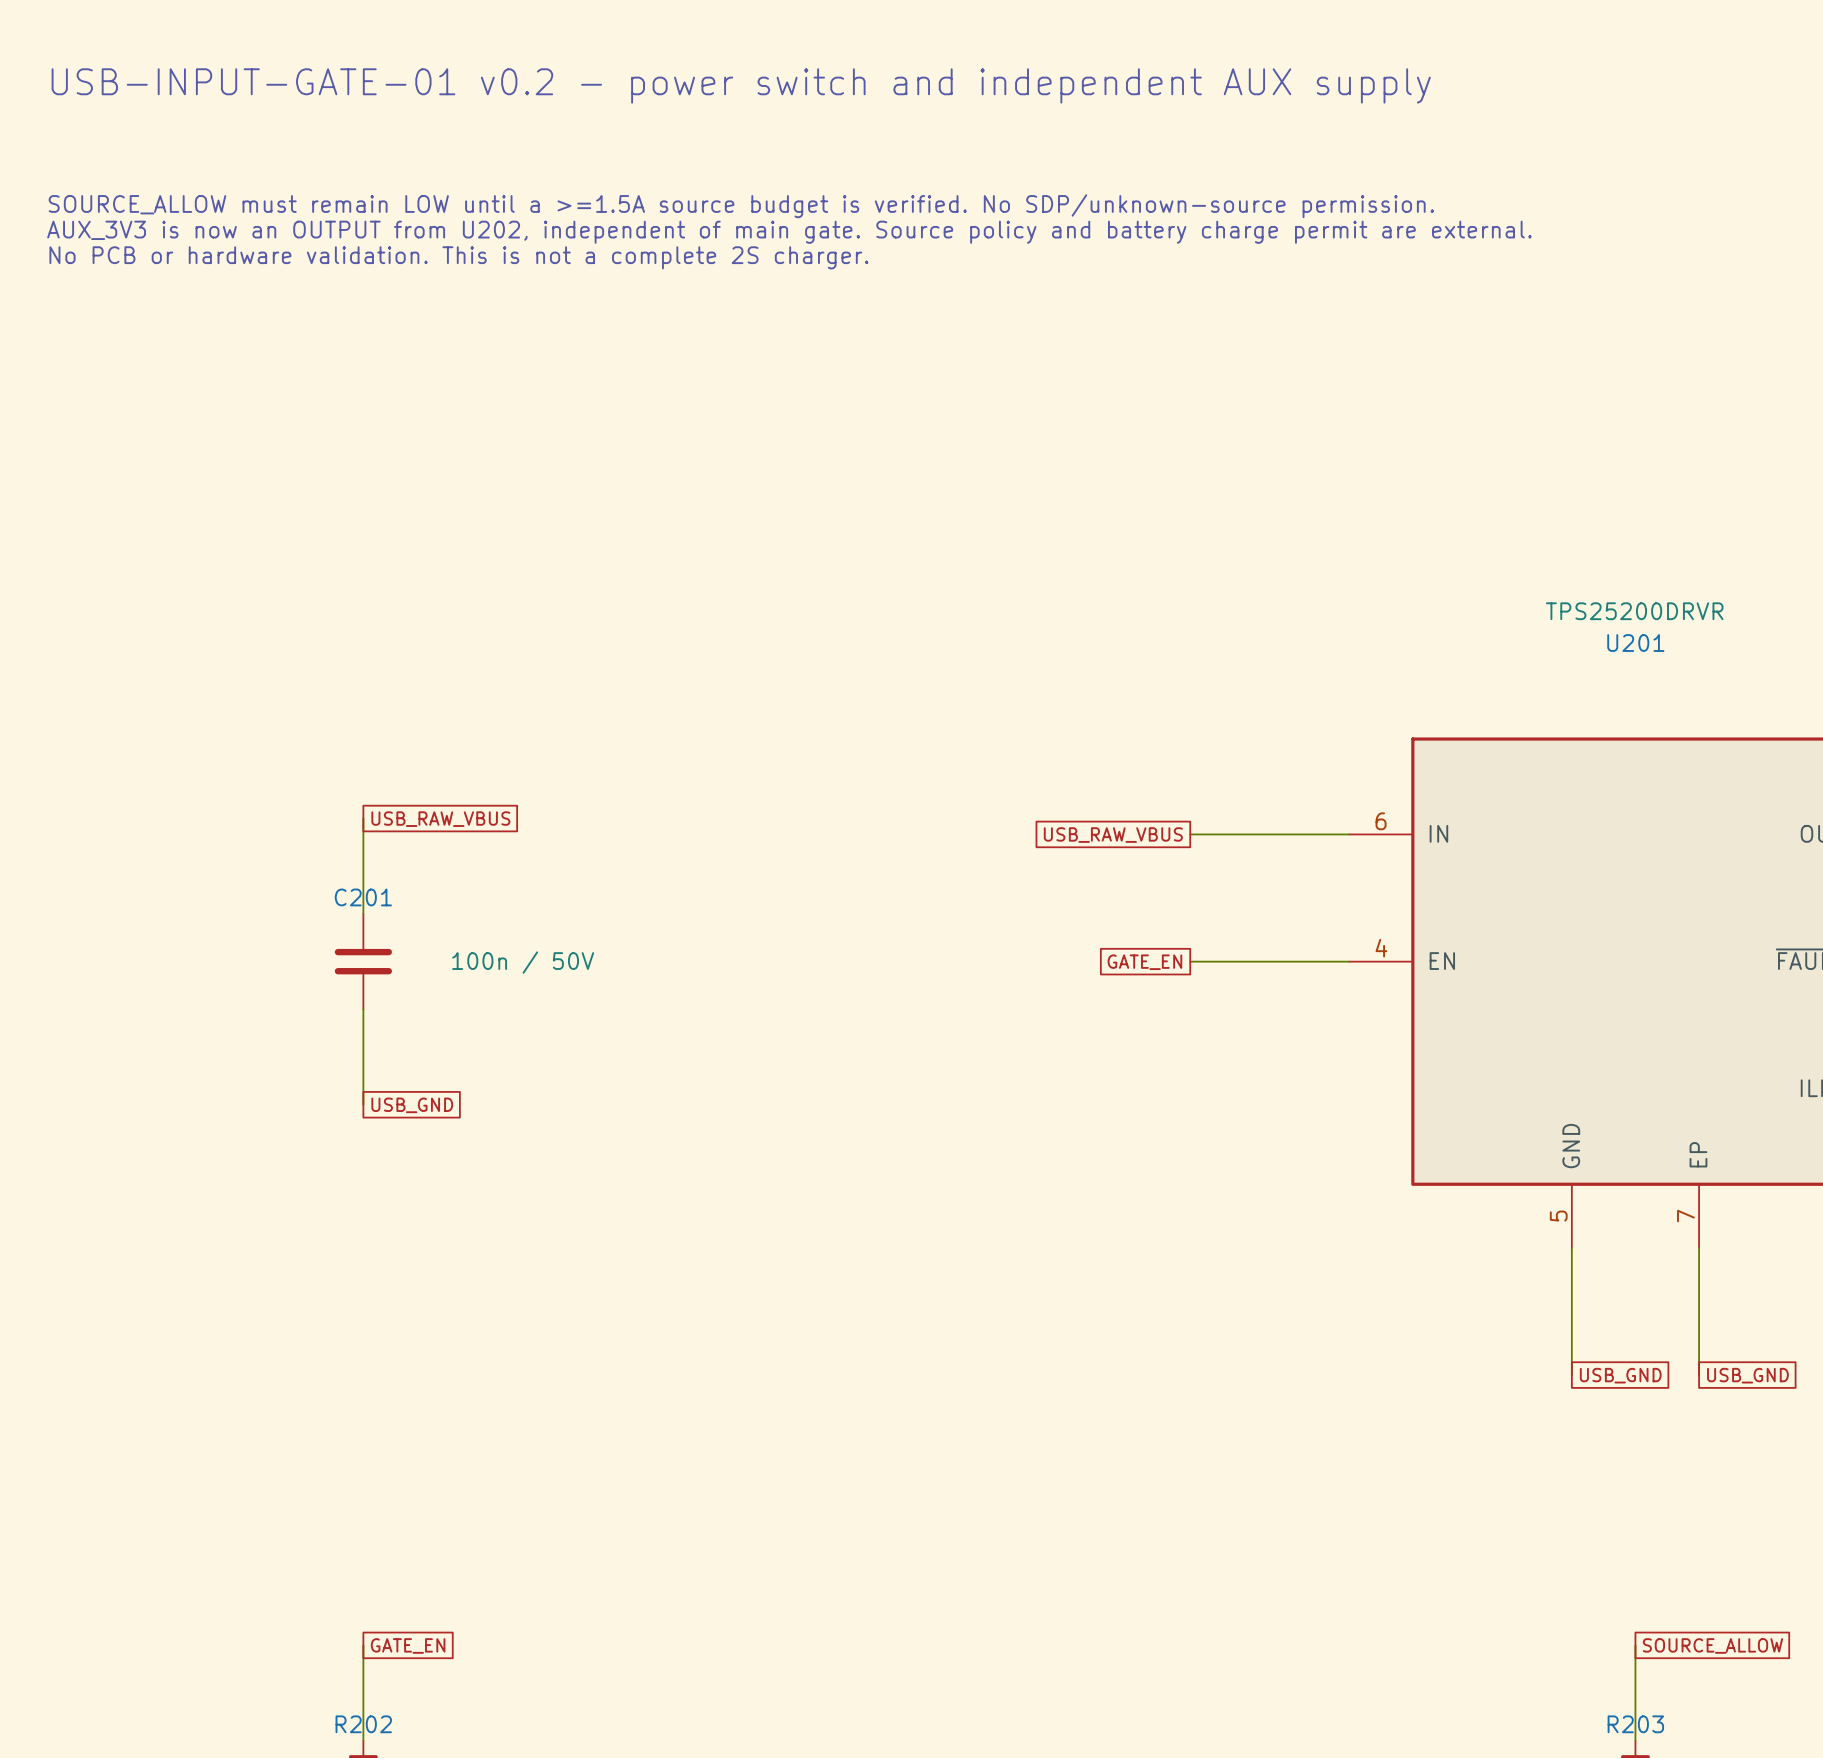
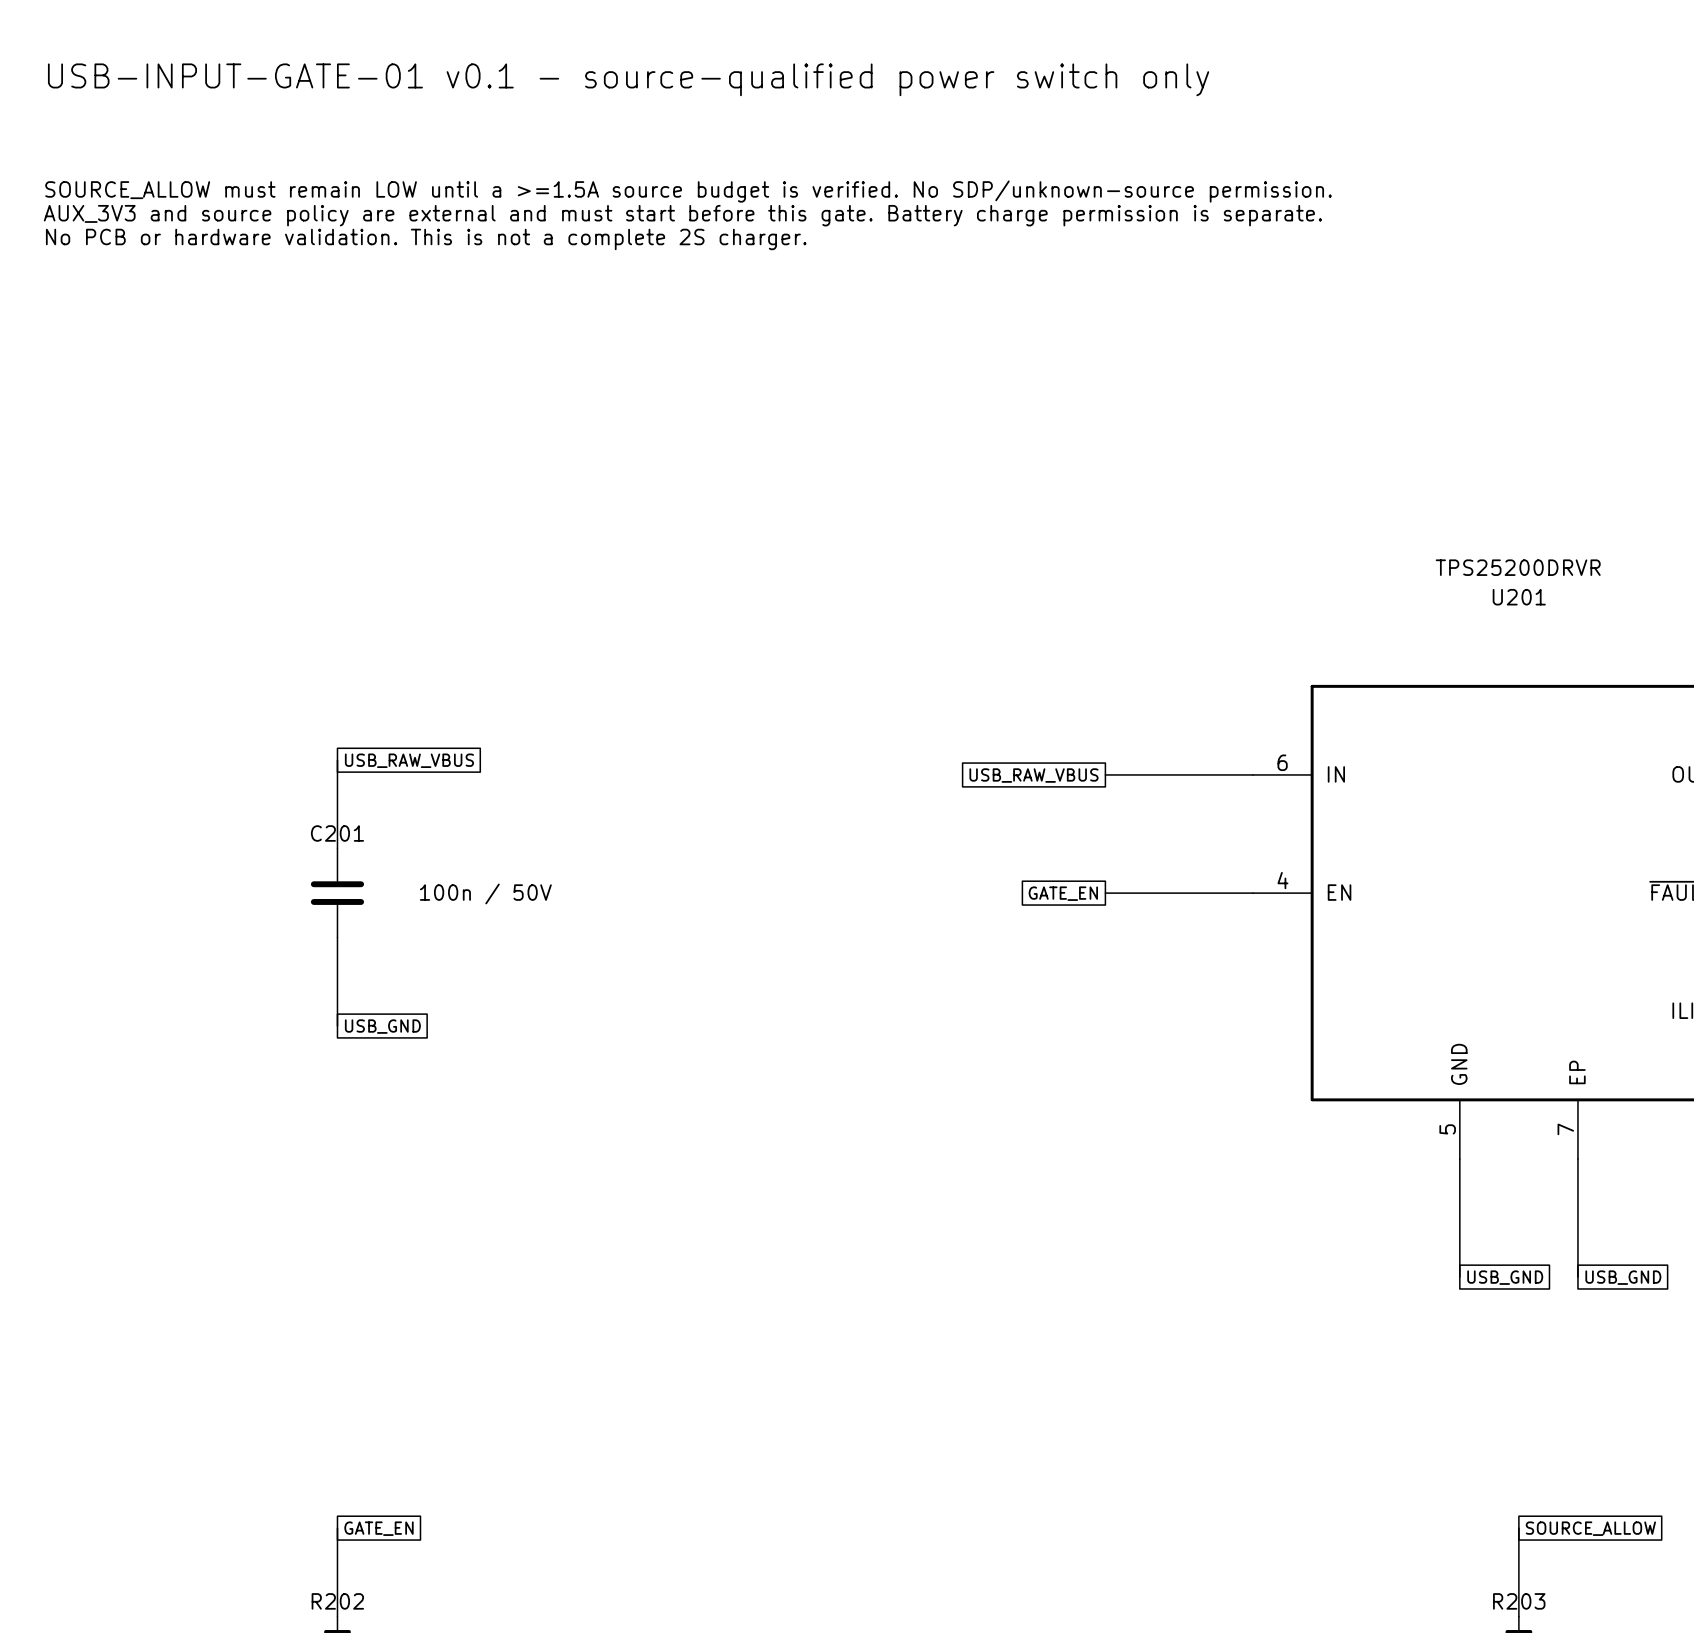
text: USB-INPUT-GATE-01 v0.2 - power switch and independent AUX supply (741, 85) -> USB-INPUT-GATE-01 v0.1 - source-qualified power switch only (628, 79)
text: AUX_3V3 is now an OUTPUT from U202, independent of main gate. Source policy and battery charge permit are external. (789, 232) -> AUX_3V3 and source policy are external and must start before this gate. Battery charge permission is separate. (682, 215)

